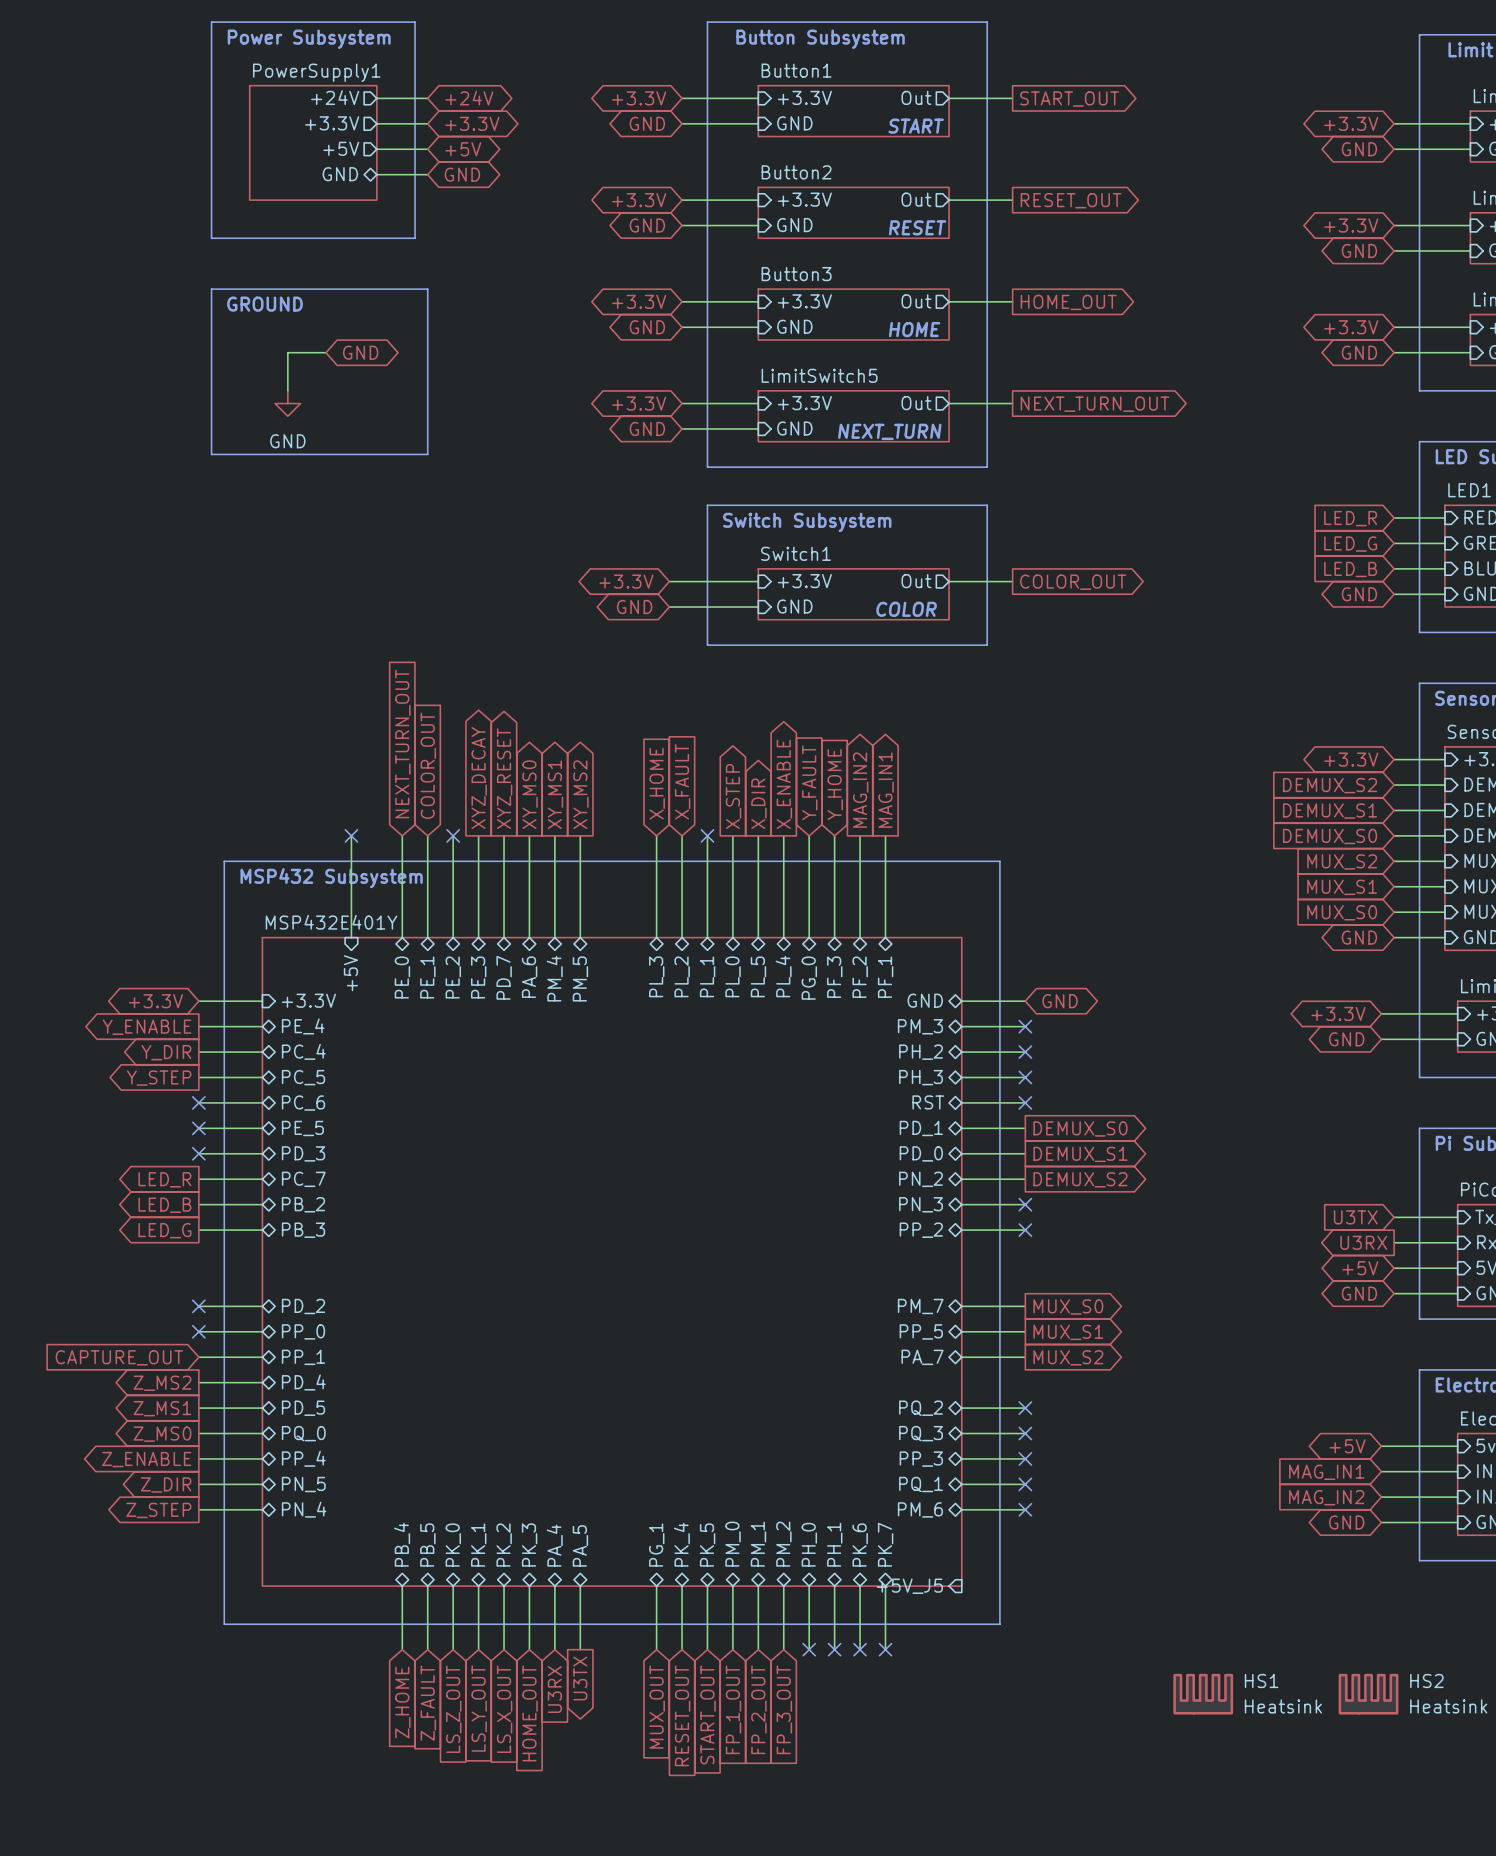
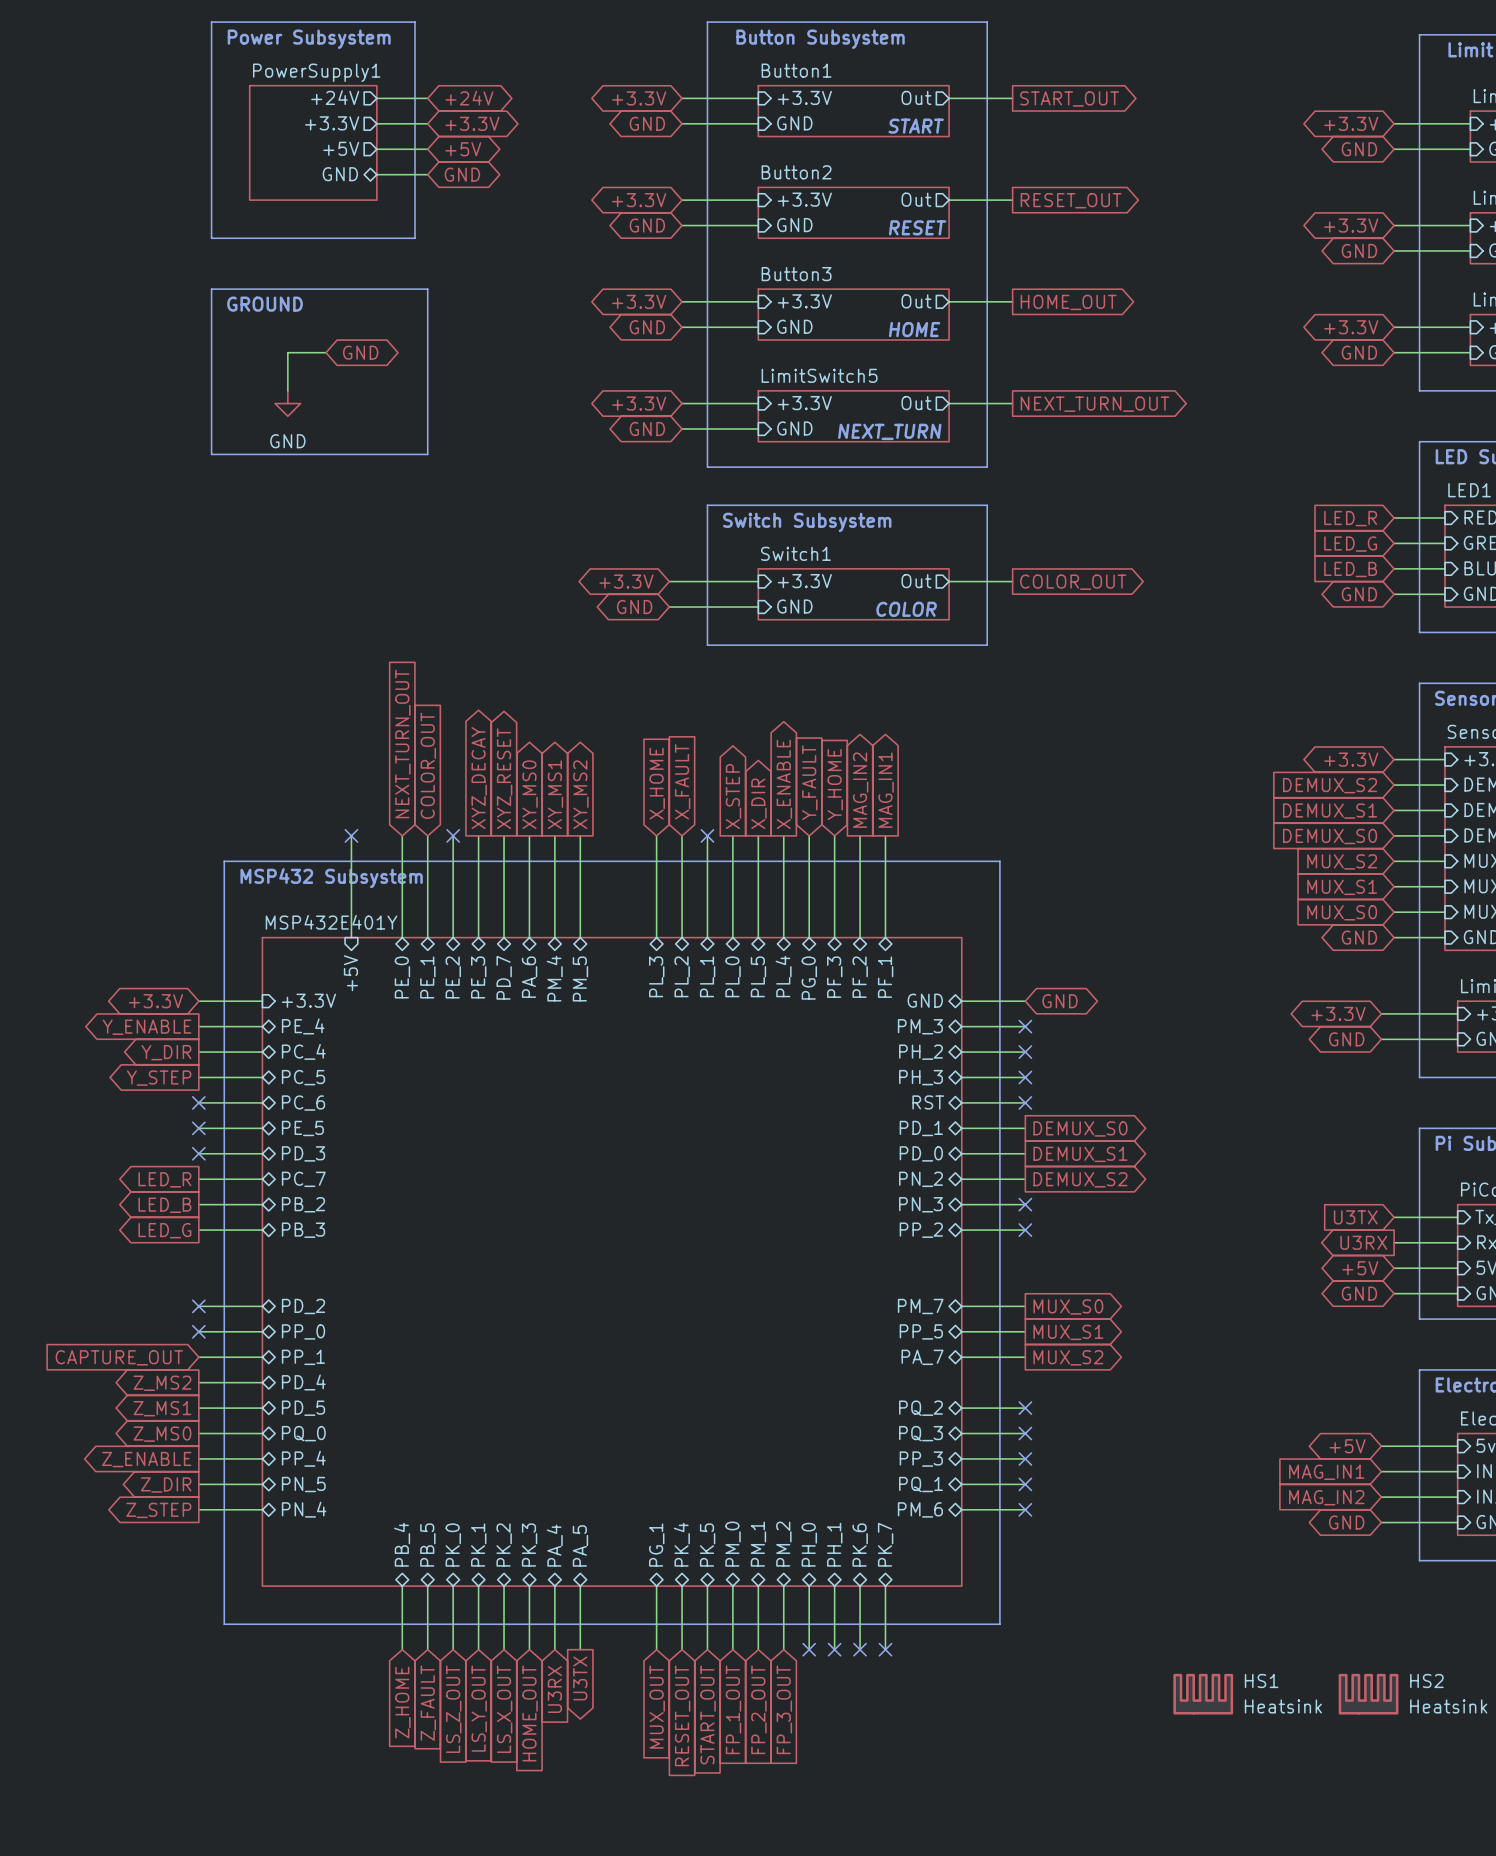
sheet pin: +5V_J5 (909, 1586) -> none

